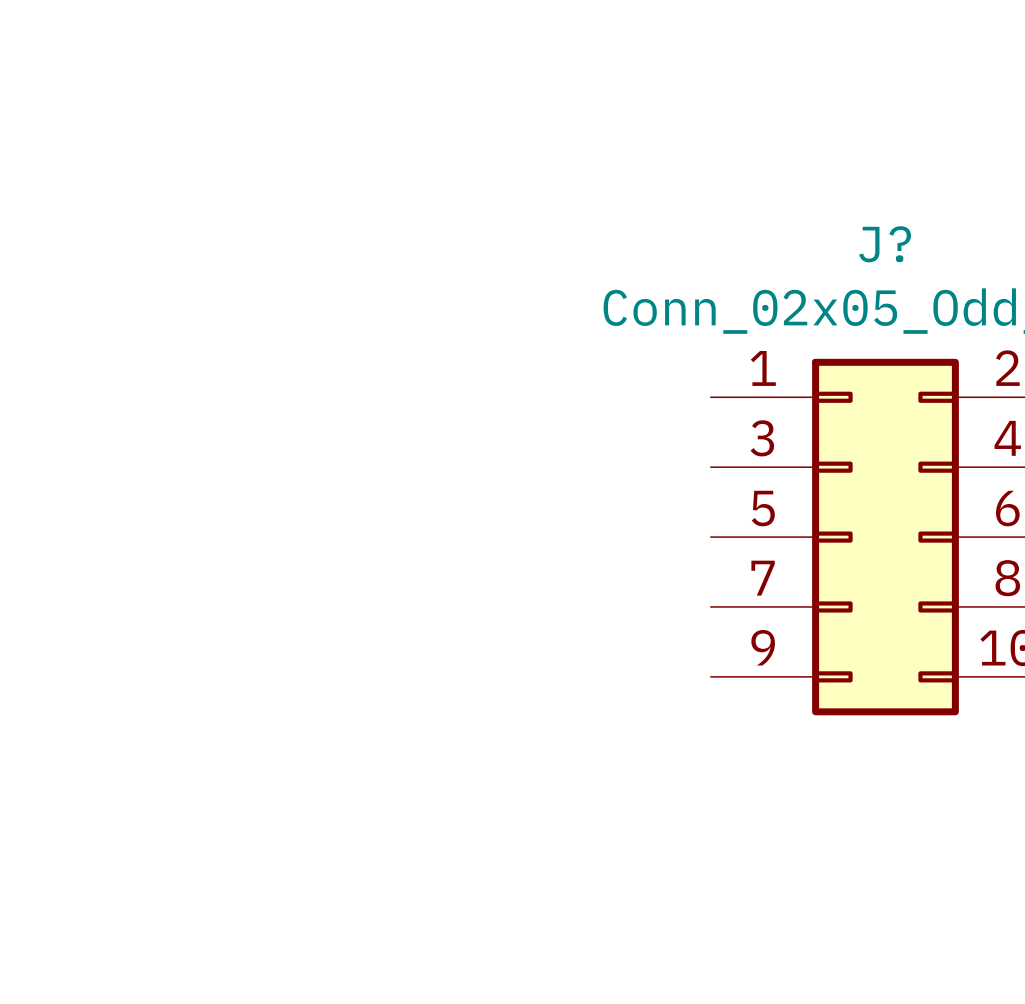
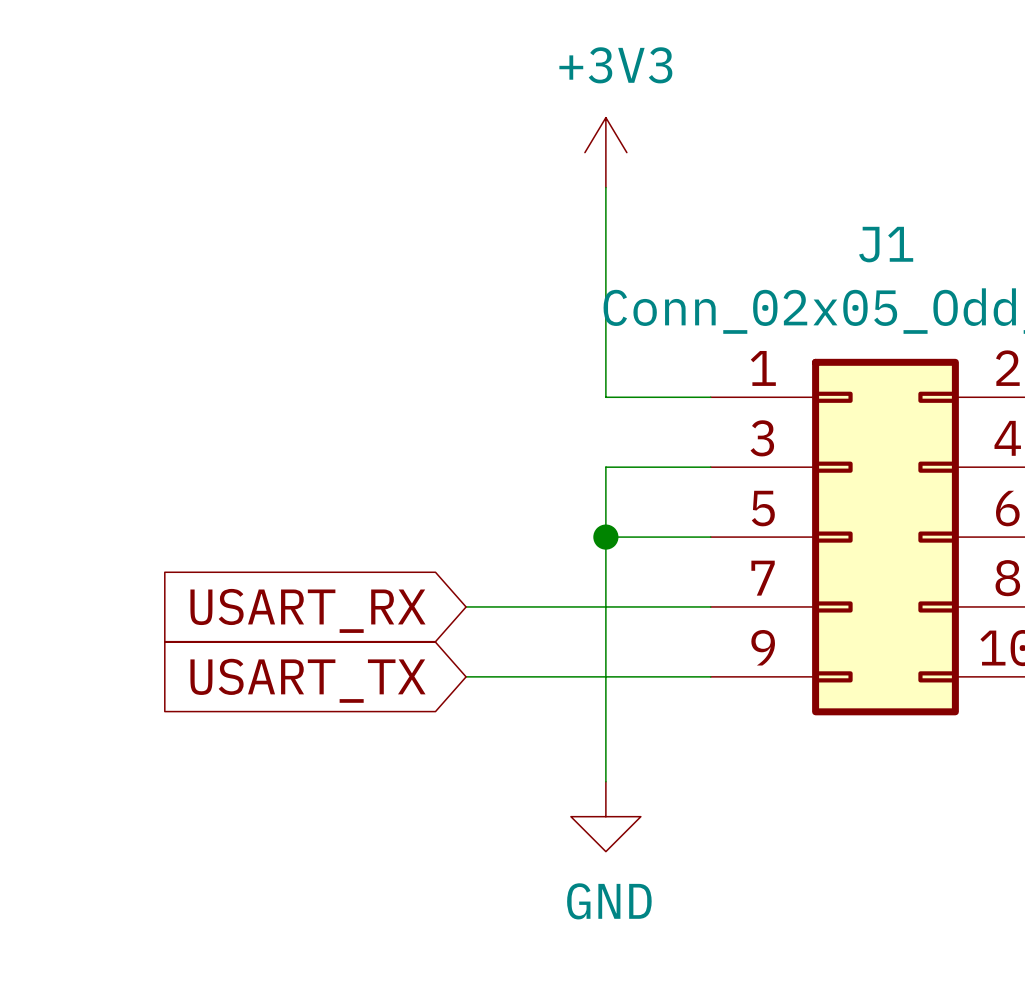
power symbol: none -> +3V3 (605, 152)
wire: none -> (605, 187) (605, 397) (710, 397)
J? name: J? (885, 244) -> J1 (886, 244)
wire: none -> (710, 467) (605, 467) (605, 781)
wire: none -> (605, 537) (710, 537)
junction: none -> (605, 537)
wire: none -> (466, 606) (710, 606)
global label: none -> USART_RX (307, 610)
wire: none -> (466, 676) (710, 676)
global label: none -> USART_TX (307, 680)
power symbol: none -> GND (605, 816)

